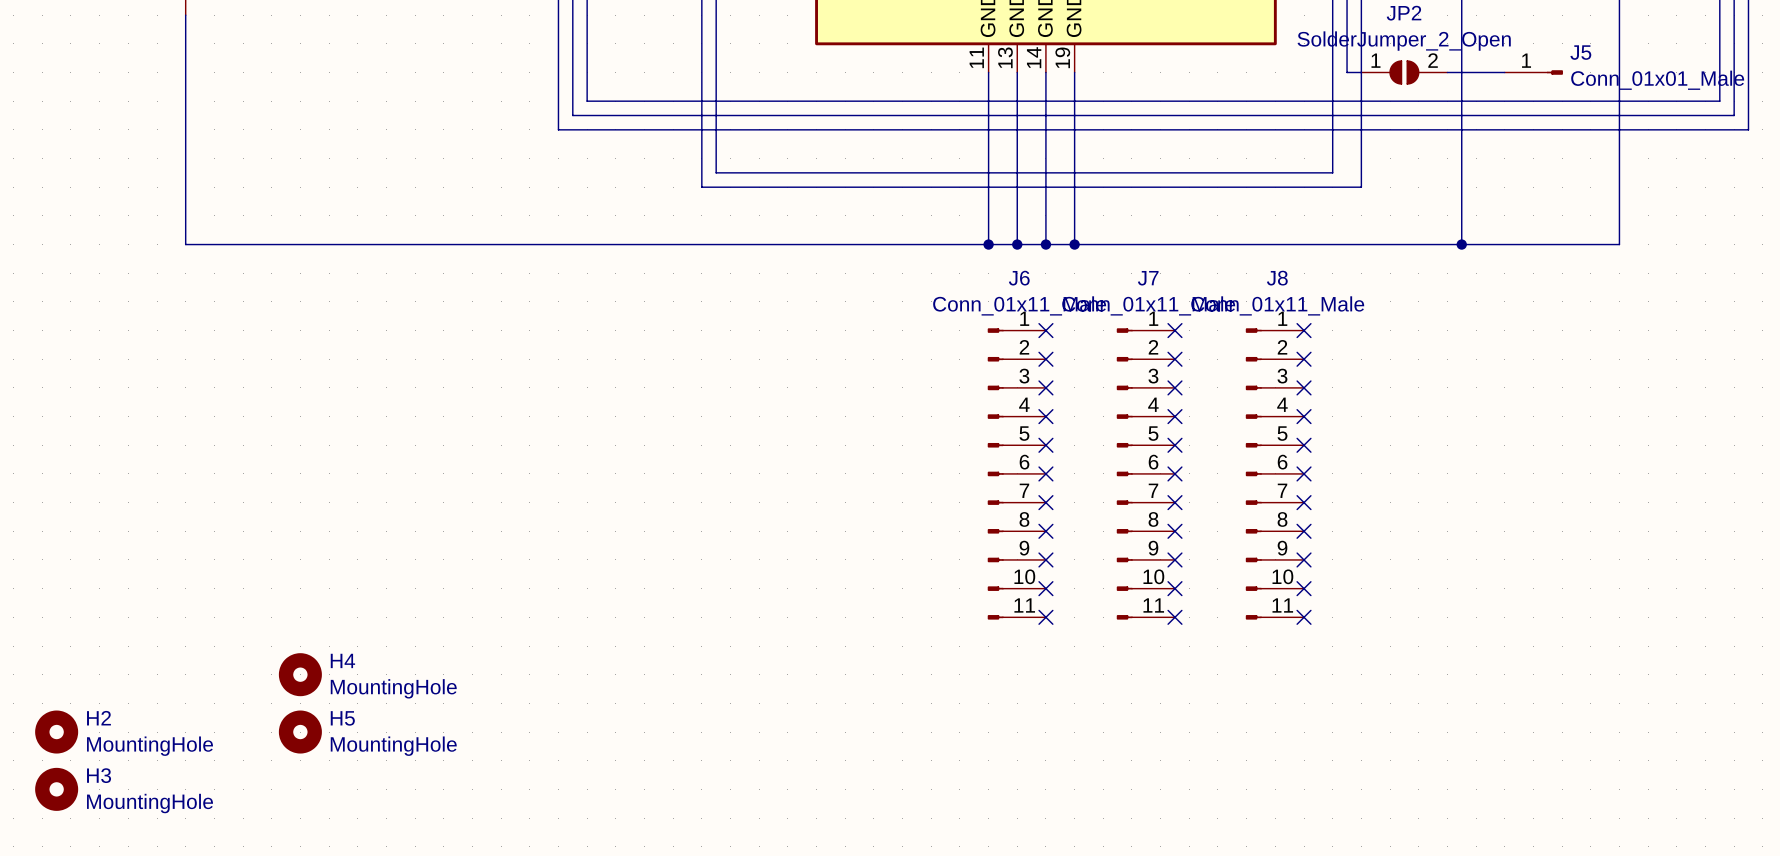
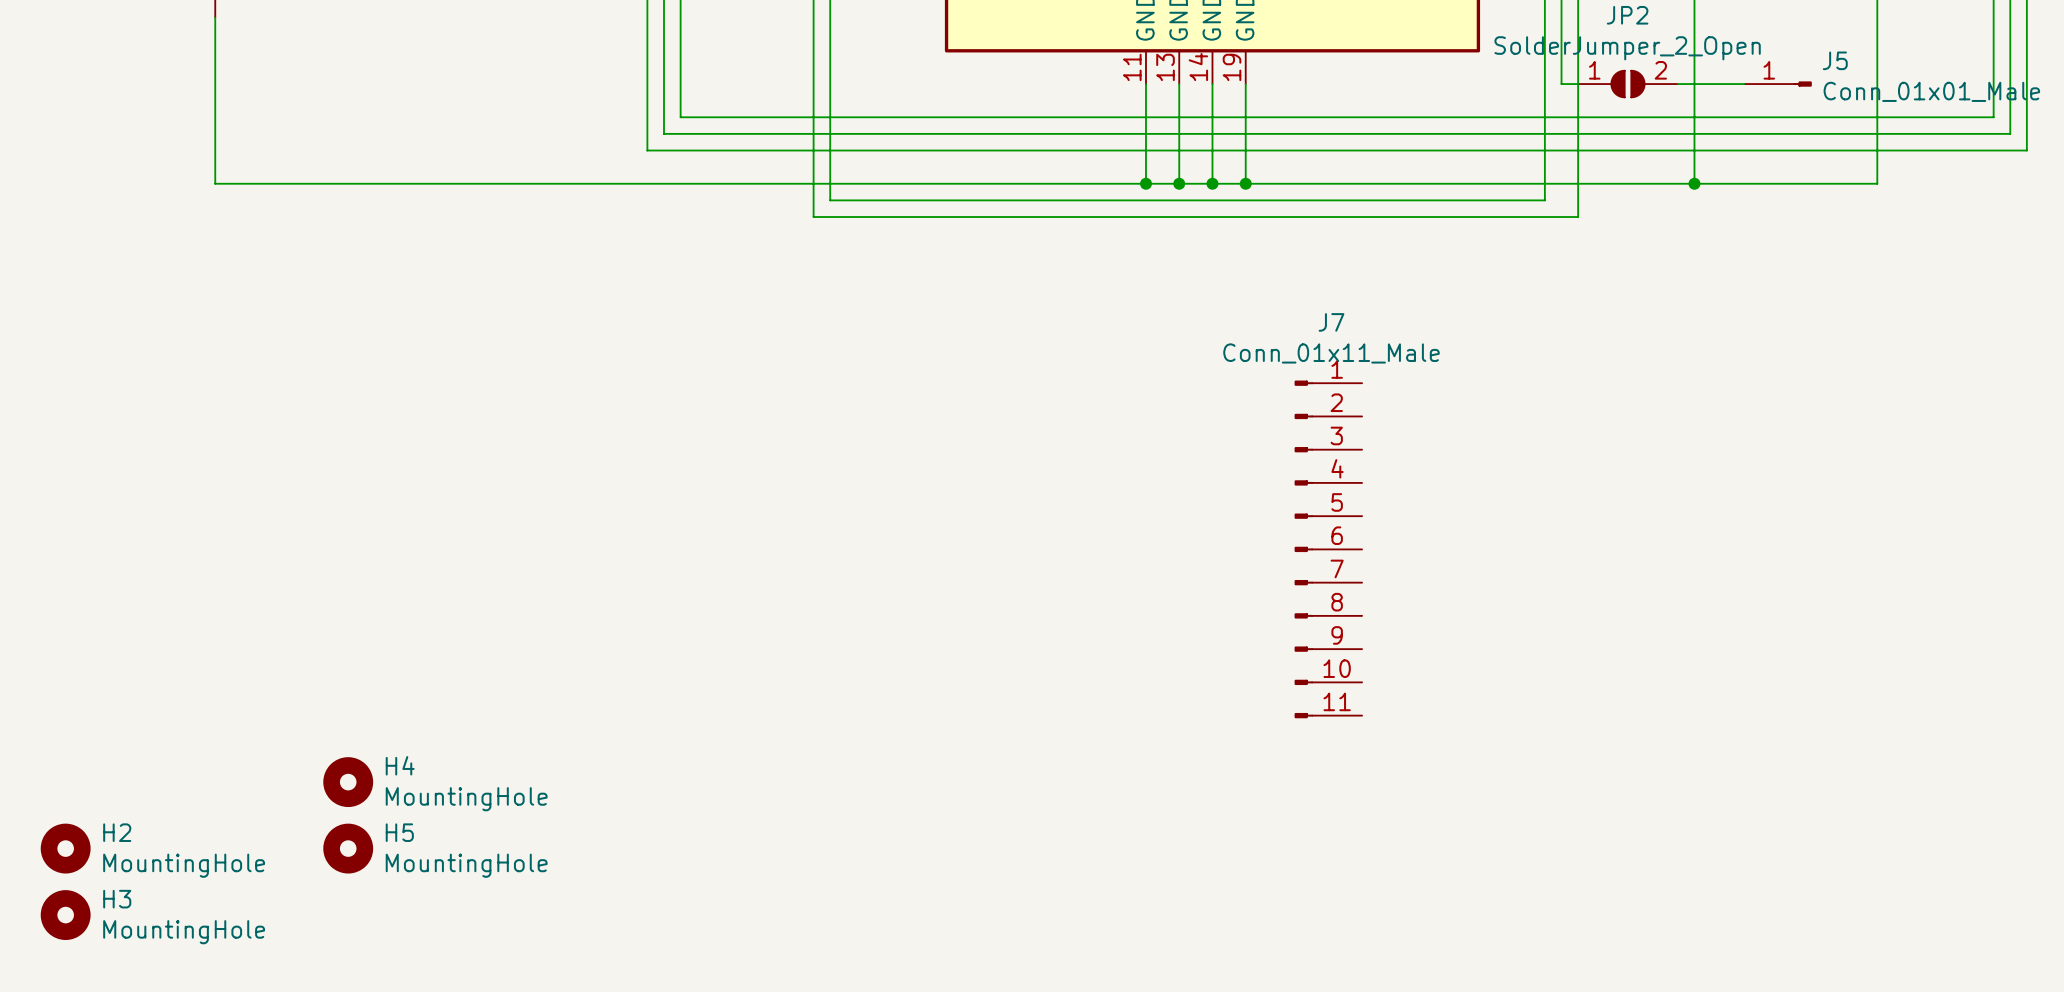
wire: (185, 158) (185, 244) (1619, 244) (1619, 158) -> (215, 183) (1877, 183)
wire: (988, 158) (988, 244) -> none
junction: none -> (1146, 183)
wire: (1017, 158) (1017, 244) -> none
junction: none -> (1179, 183)
wire: (1045, 158) (1045, 244) -> none
junction: none -> (1212, 183)
wire: (1074, 158) (1074, 244) -> none
junction: none -> (1245, 183)
wire: (1461, 158) (1461, 244) -> none
junction: none -> (1694, 183)
junction: (988, 244) -> none
junction: (1017, 244) -> none
junction: (1045, 244) -> none
junction: (1074, 244) -> none
junction: (1461, 244) -> none
no-connect mark: (1045, 330) -> none
no-connect mark: (1174, 330) -> none
no-connect mark: (1304, 330) -> none
no-connect mark: (1045, 359) -> none
no-connect mark: (1174, 359) -> none
no-connect mark: (1304, 359) -> none
no-connect mark: (1045, 387) -> none
no-connect mark: (1174, 387) -> none
no-connect mark: (1304, 387) -> none
no-connect mark: (1045, 416) -> none
no-connect mark: (1174, 416) -> none
no-connect mark: (1304, 416) -> none
no-connect mark: (1045, 445) -> none
no-connect mark: (1174, 445) -> none
no-connect mark: (1304, 445) -> none
J6: Conn_01x11_Male (1016, 473) -> none
no-connect mark: (1045, 473) -> none
no-connect mark: (1174, 473) -> none
J8: Conn_01x11_Male (1274, 473) -> none
no-connect mark: (1304, 473) -> none
no-connect mark: (1045, 502) -> none
no-connect mark: (1174, 502) -> none
no-connect mark: (1304, 502) -> none
no-connect mark: (1045, 531) -> none
no-connect mark: (1174, 531) -> none
no-connect mark: (1304, 531) -> none
no-connect mark: (1045, 559) -> none
no-connect mark: (1174, 559) -> none
no-connect mark: (1304, 559) -> none
no-connect mark: (1045, 588) -> none
no-connect mark: (1174, 588) -> none
no-connect mark: (1304, 588) -> none
no-connect mark: (1045, 617) -> none
no-connect mark: (1174, 617) -> none
no-connect mark: (1304, 617) -> none

